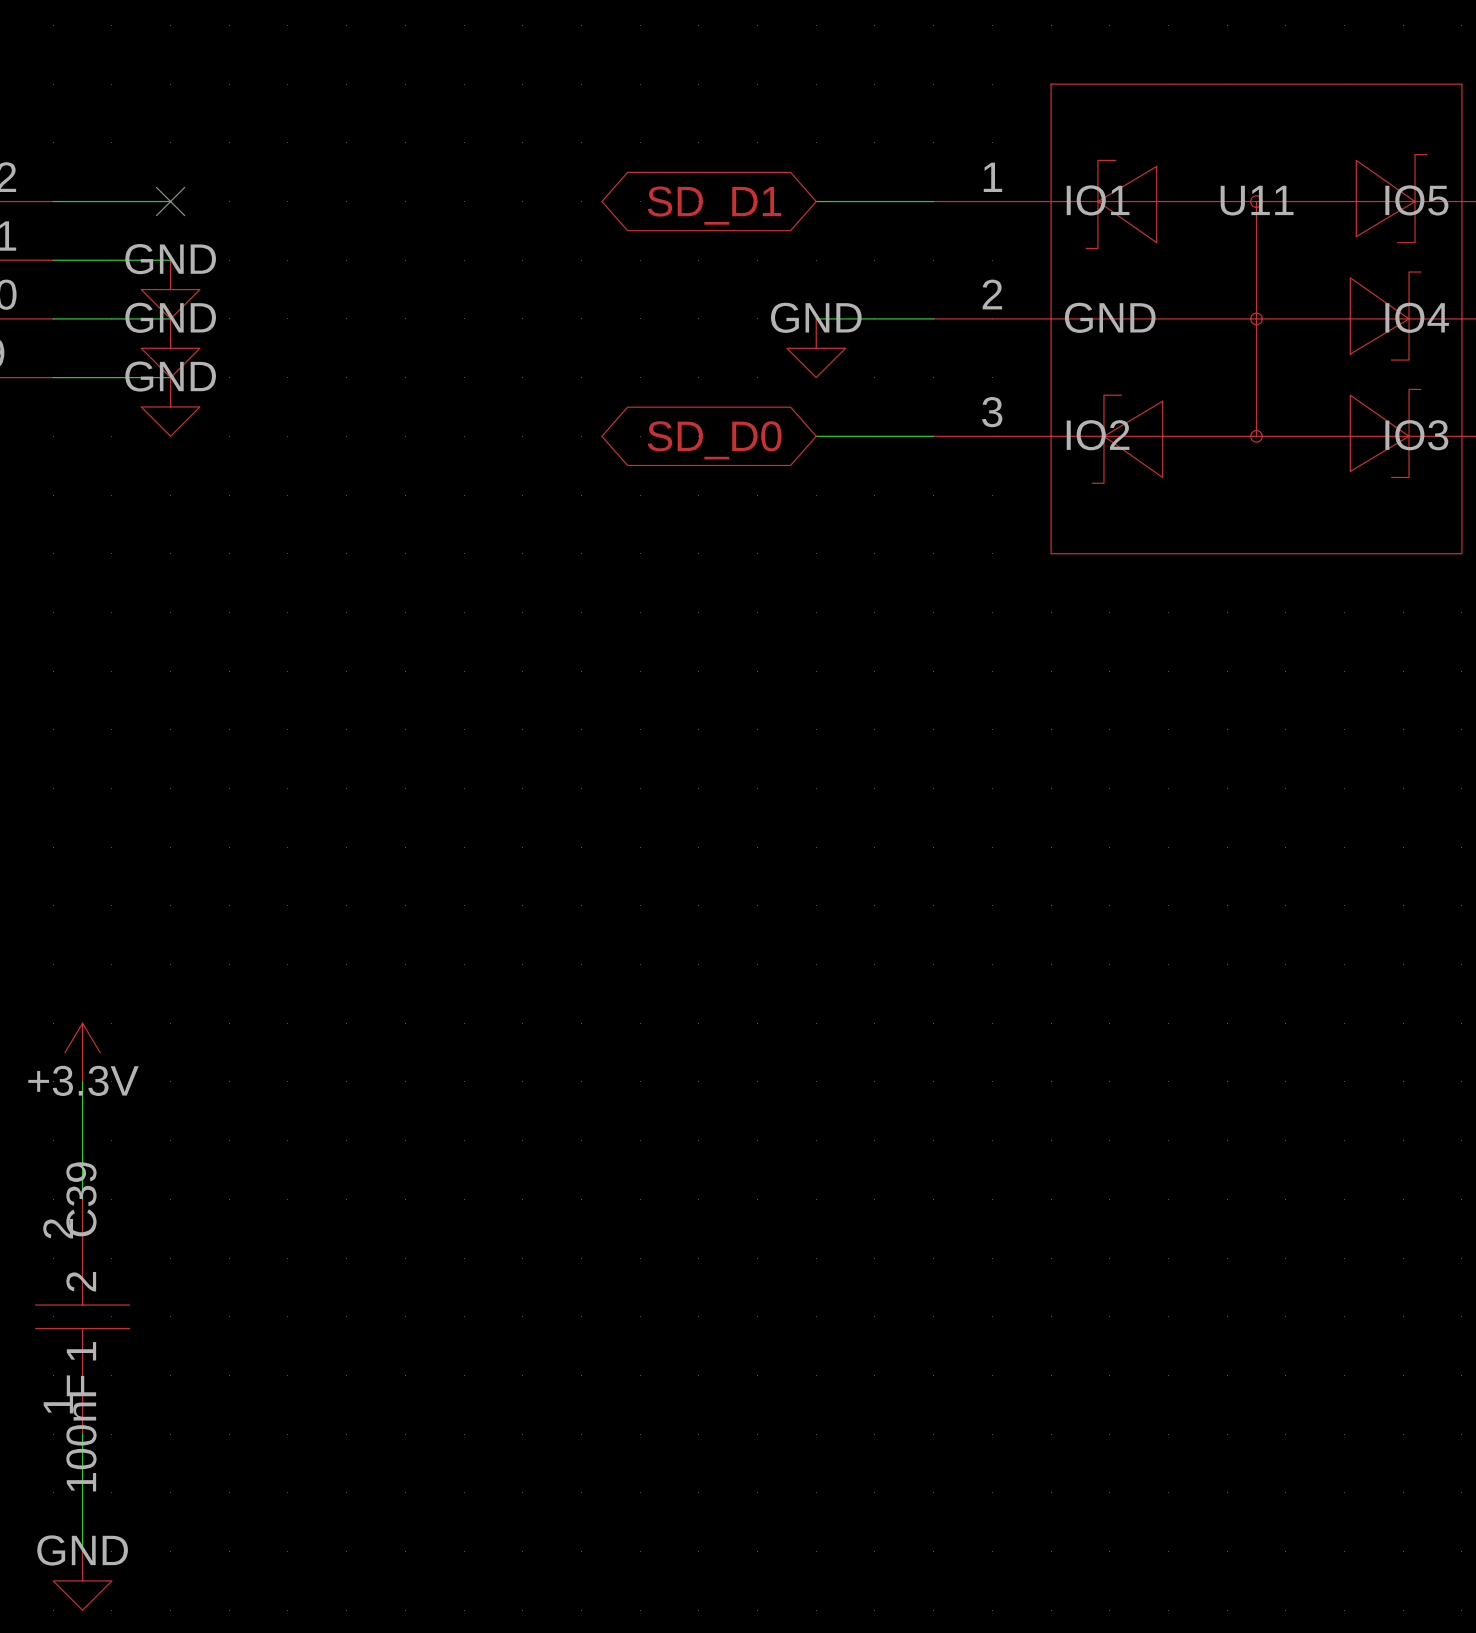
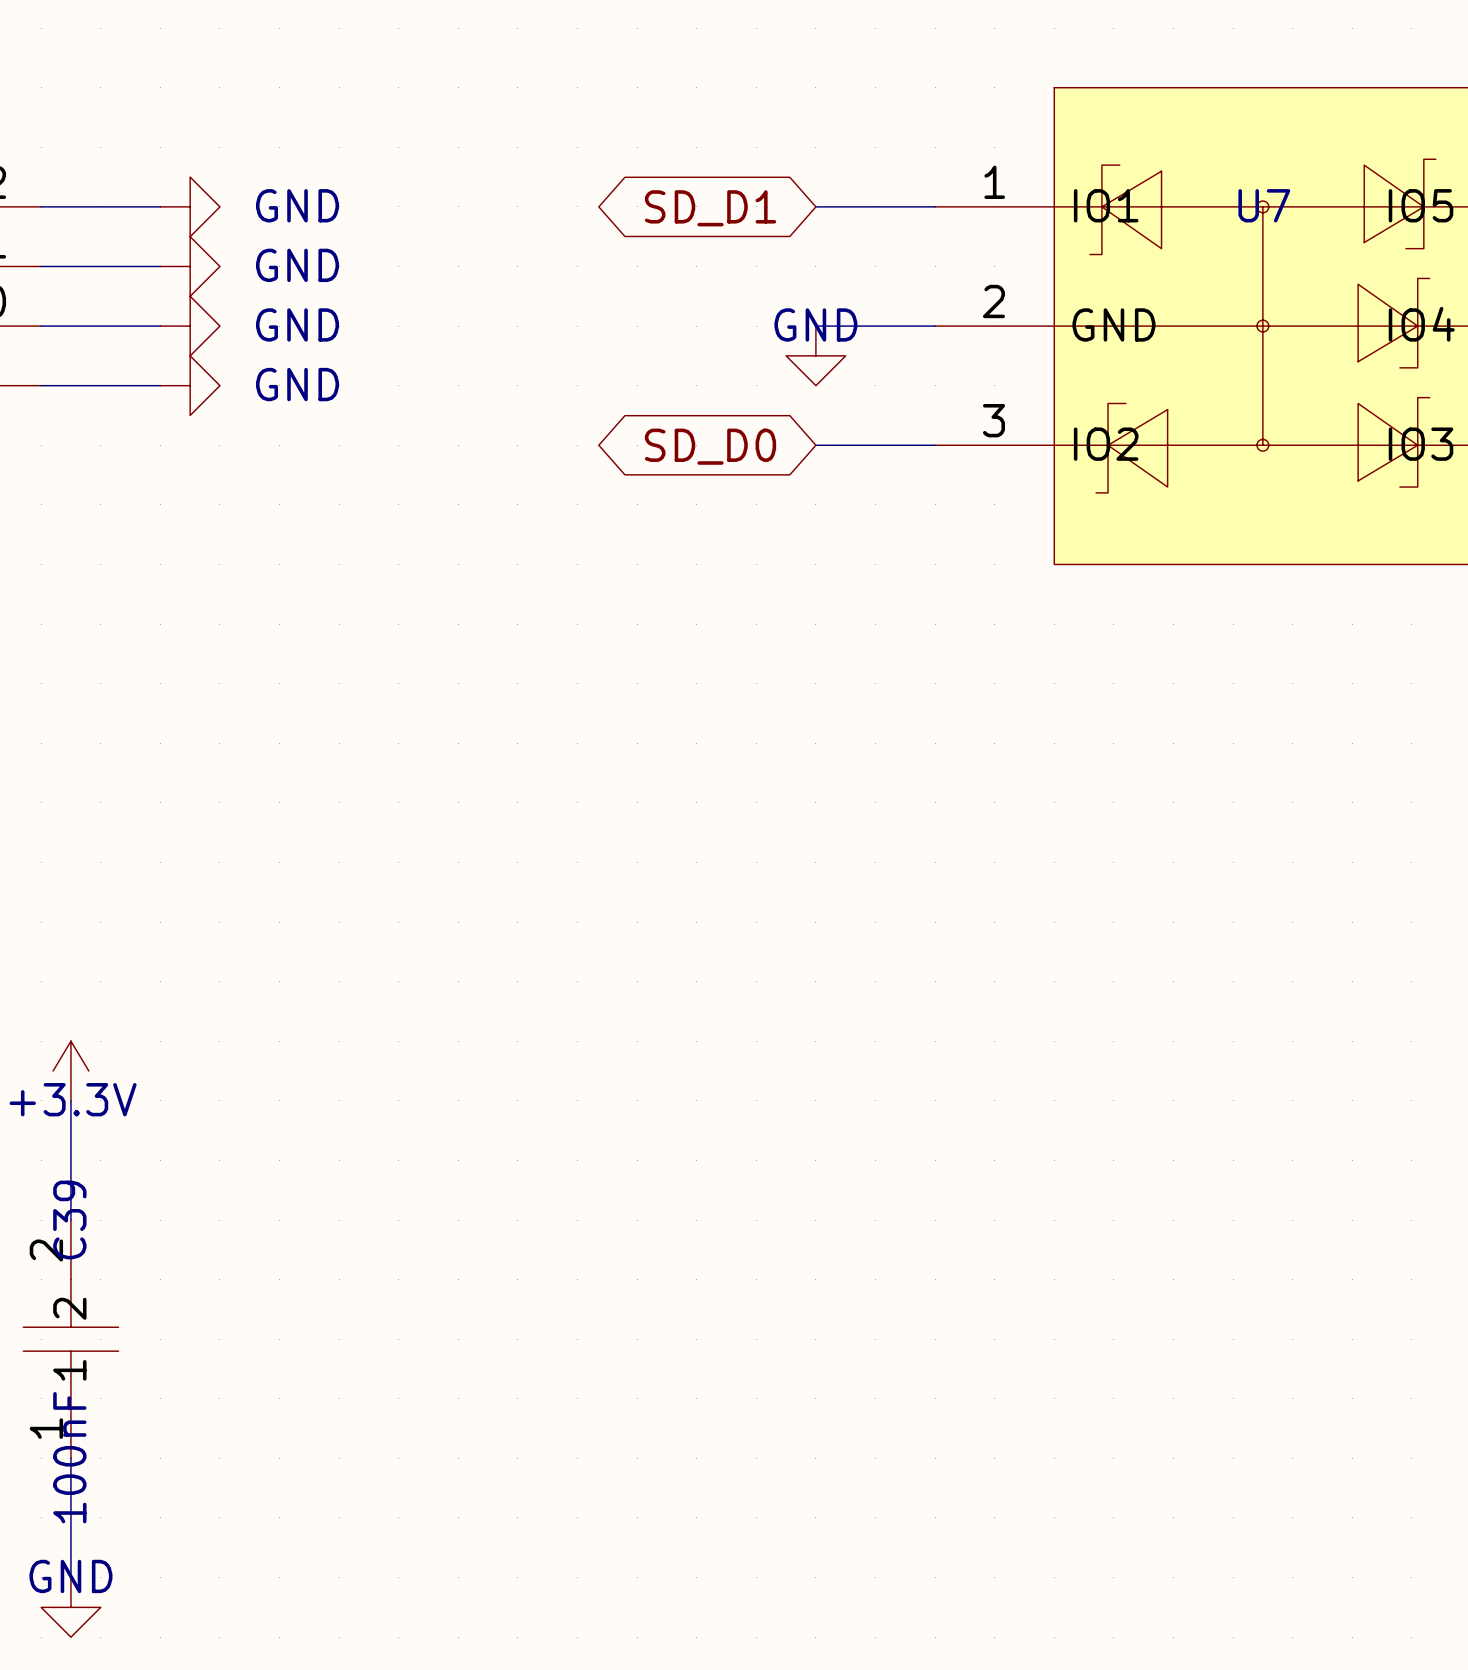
U11 name: U11 (1257, 200) -> U7 (1264, 205)
no-connect mark: (170, 201) -> none
power symbol: none -> GND (190, 206)
power symbol: none -> GND (190, 266)
power symbol: GND (170, 289) -> none
power symbol: none -> GND (190, 326)
power symbol: GND (170, 348) -> none
power symbol: none -> GND (190, 385)
power symbol: GND (170, 406) -> none

